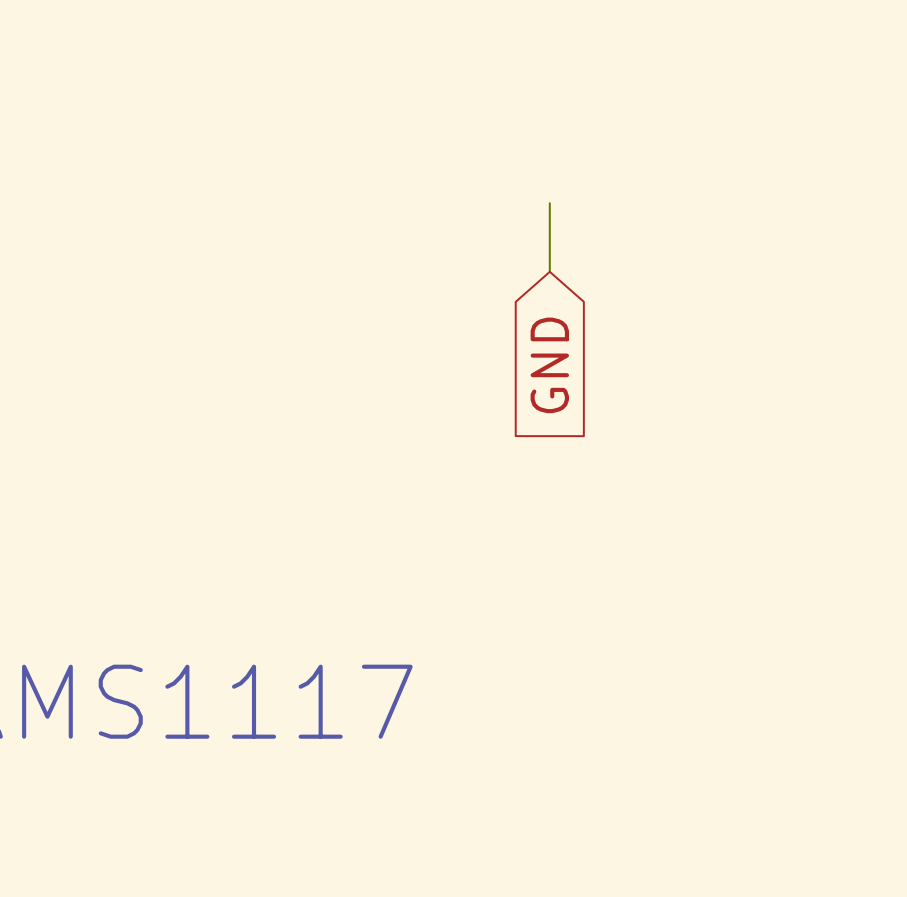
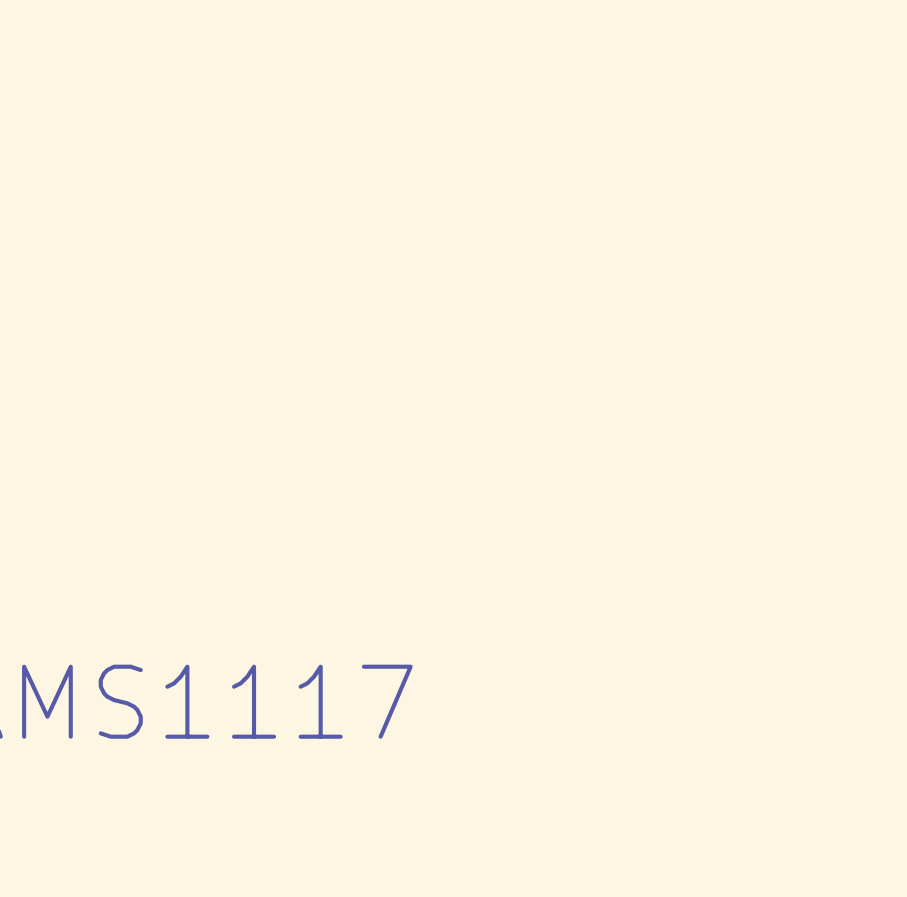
wire: (549, 203) (549, 271) -> none
global label: GND (549, 365) -> none

